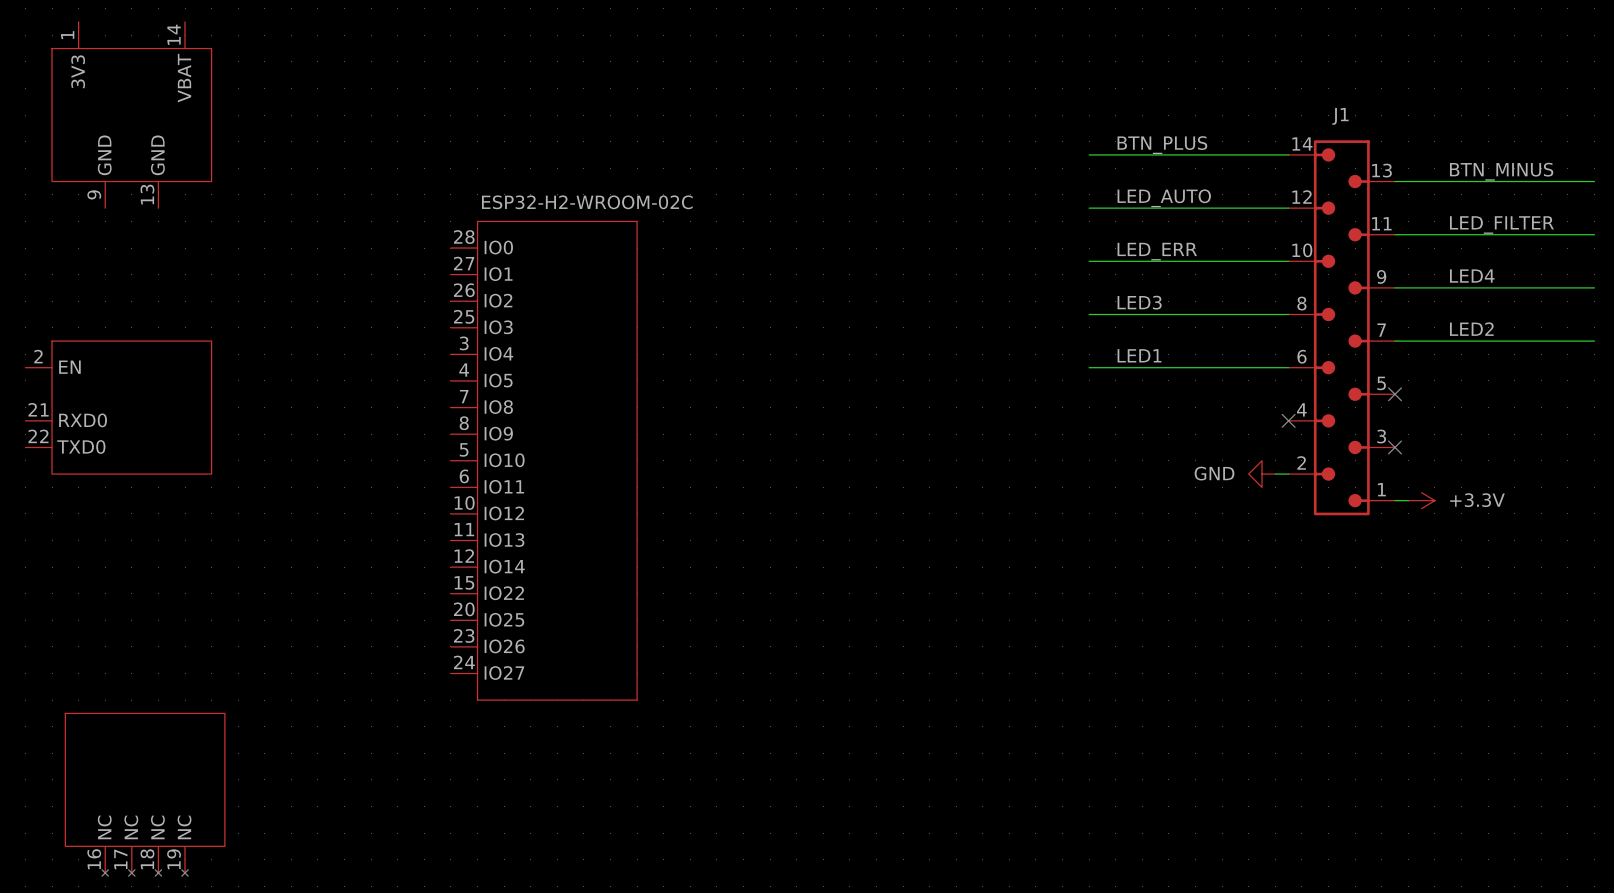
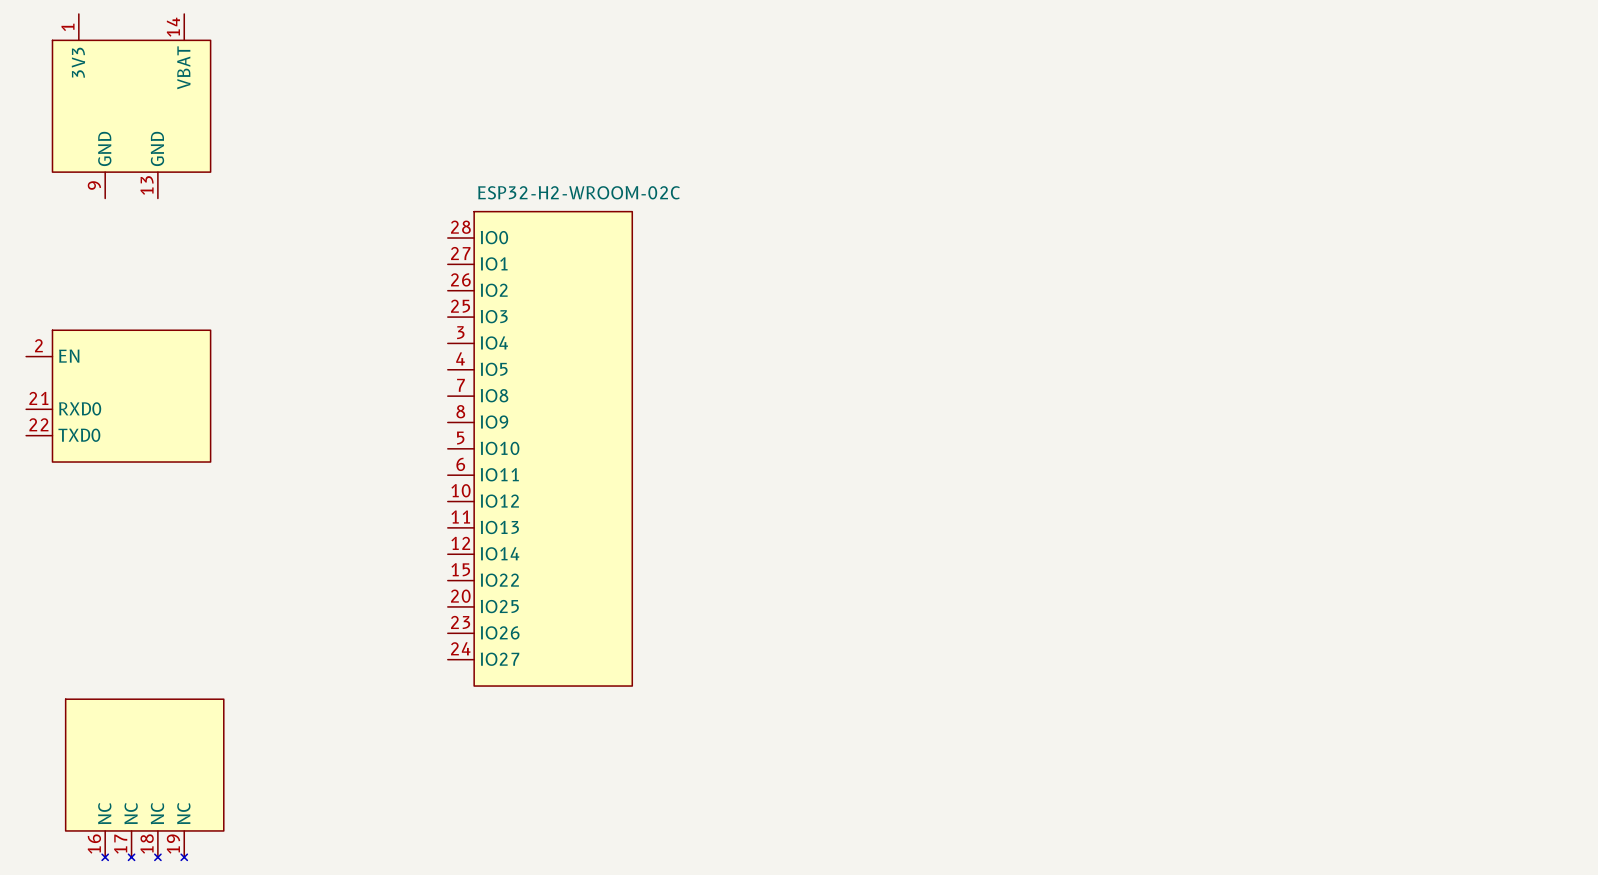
label: BTN_PLUS (1162, 145) -> none
wire: (1089, 154) (1288, 154) -> none
label: BTN_MINUS (1501, 171) -> none
wire: (1395, 181) (1594, 181) -> none
label: LED_AUTO (1164, 198) -> none
wire: (1089, 208) (1288, 208) -> none
label: LED_FILTER (1501, 225) -> none
wire: (1395, 234) (1594, 234) -> none
label: LED_ERR (1157, 251) -> none
wire: (1089, 261) (1288, 261) -> none
label: LED4 (1472, 276) -> none
wire: (1395, 287) (1594, 287) -> none
label: LED3 (1139, 302) -> none
wire: (1089, 314) (1288, 314) -> none
J1: (1341, 327) -> none
label: LED2 (1471, 329) -> none
wire: (1395, 341) (1594, 341) -> none
label: LED1 (1139, 355) -> none
wire: (1089, 367) (1288, 367) -> none
no-connect mark: (1395, 394) -> none
no-connect mark: (1288, 420) -> none
no-connect mark: (1395, 447) -> none
power symbol: GND (1262, 474) -> none
wire: (1275, 474) (1288, 474) -> none
wire: (1395, 500) (1408, 500) -> none
power symbol: +3.3V (1421, 500) -> none

